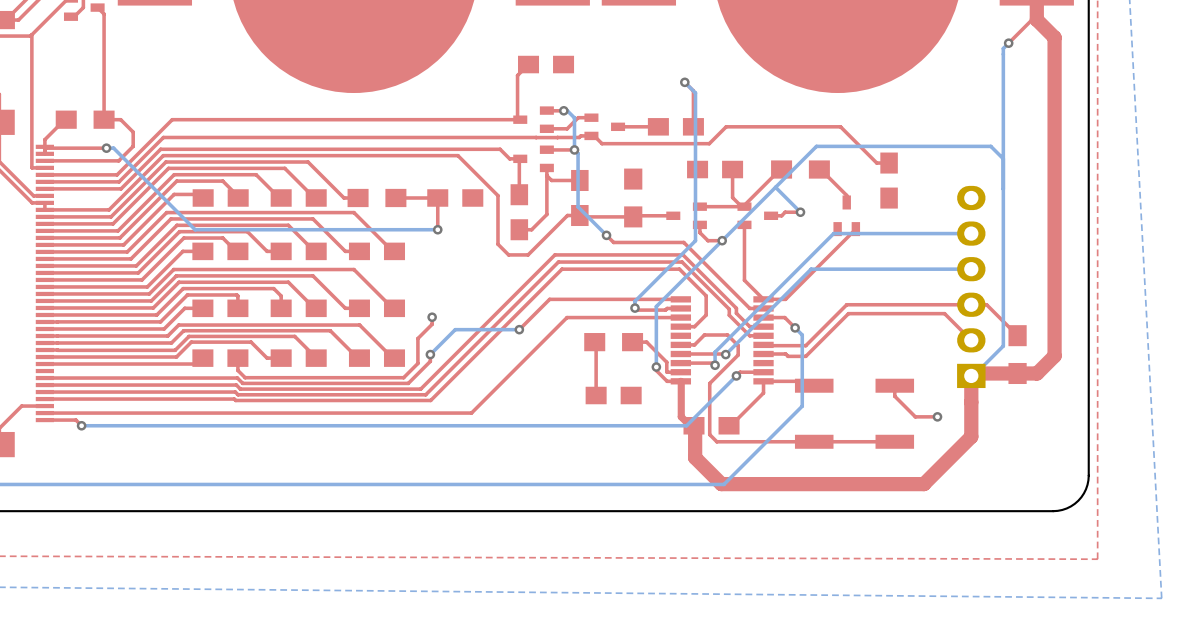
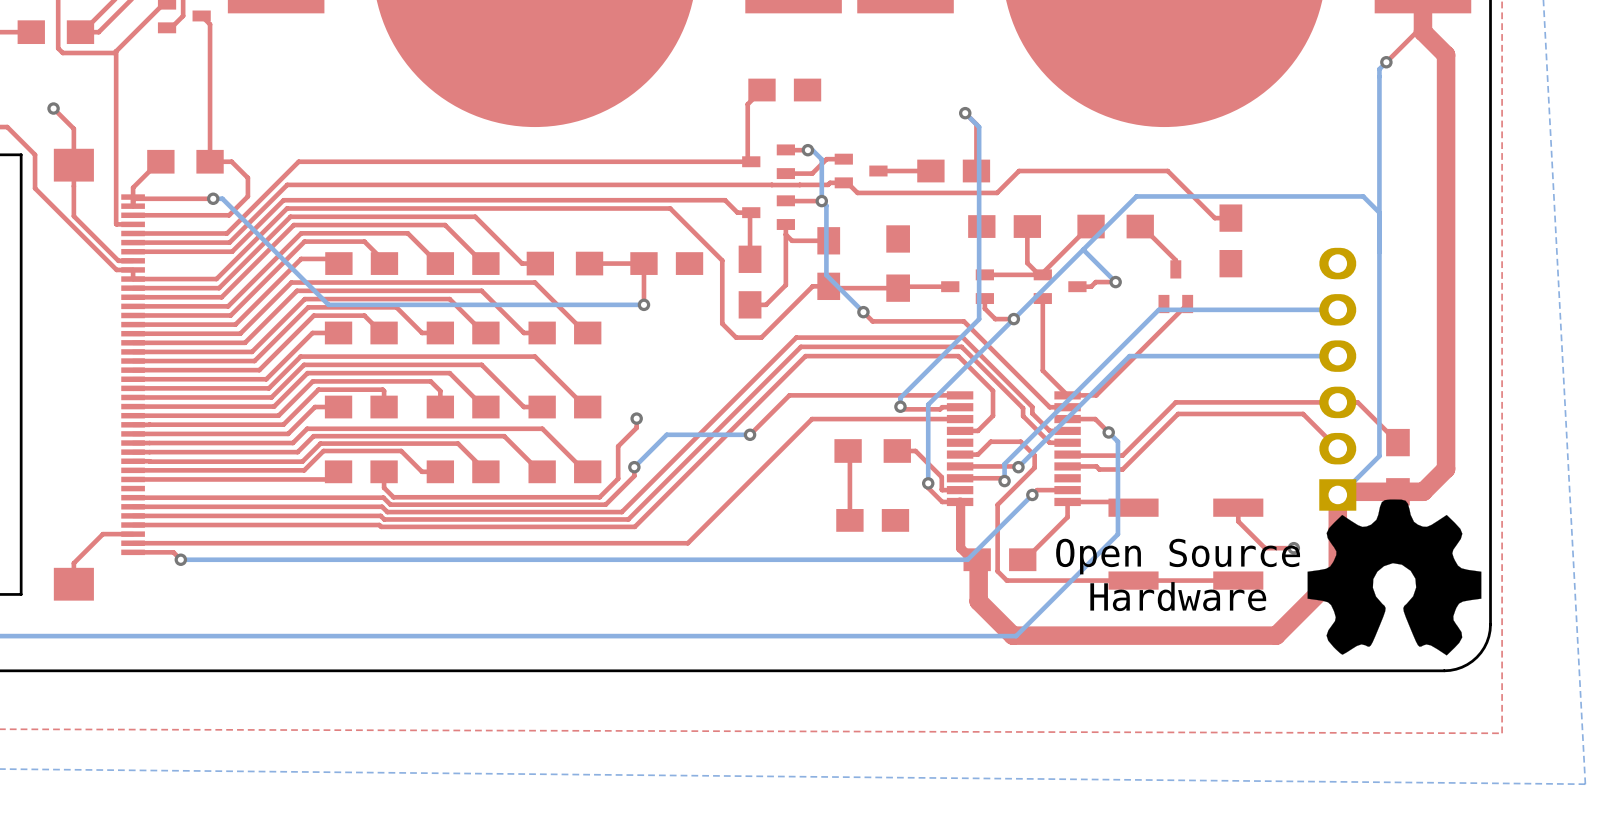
drawing: none -> [1307, 499, 1482, 656]
text: none -> Open Source (1178, 556)
text: none -> Hardware (1178, 596)

